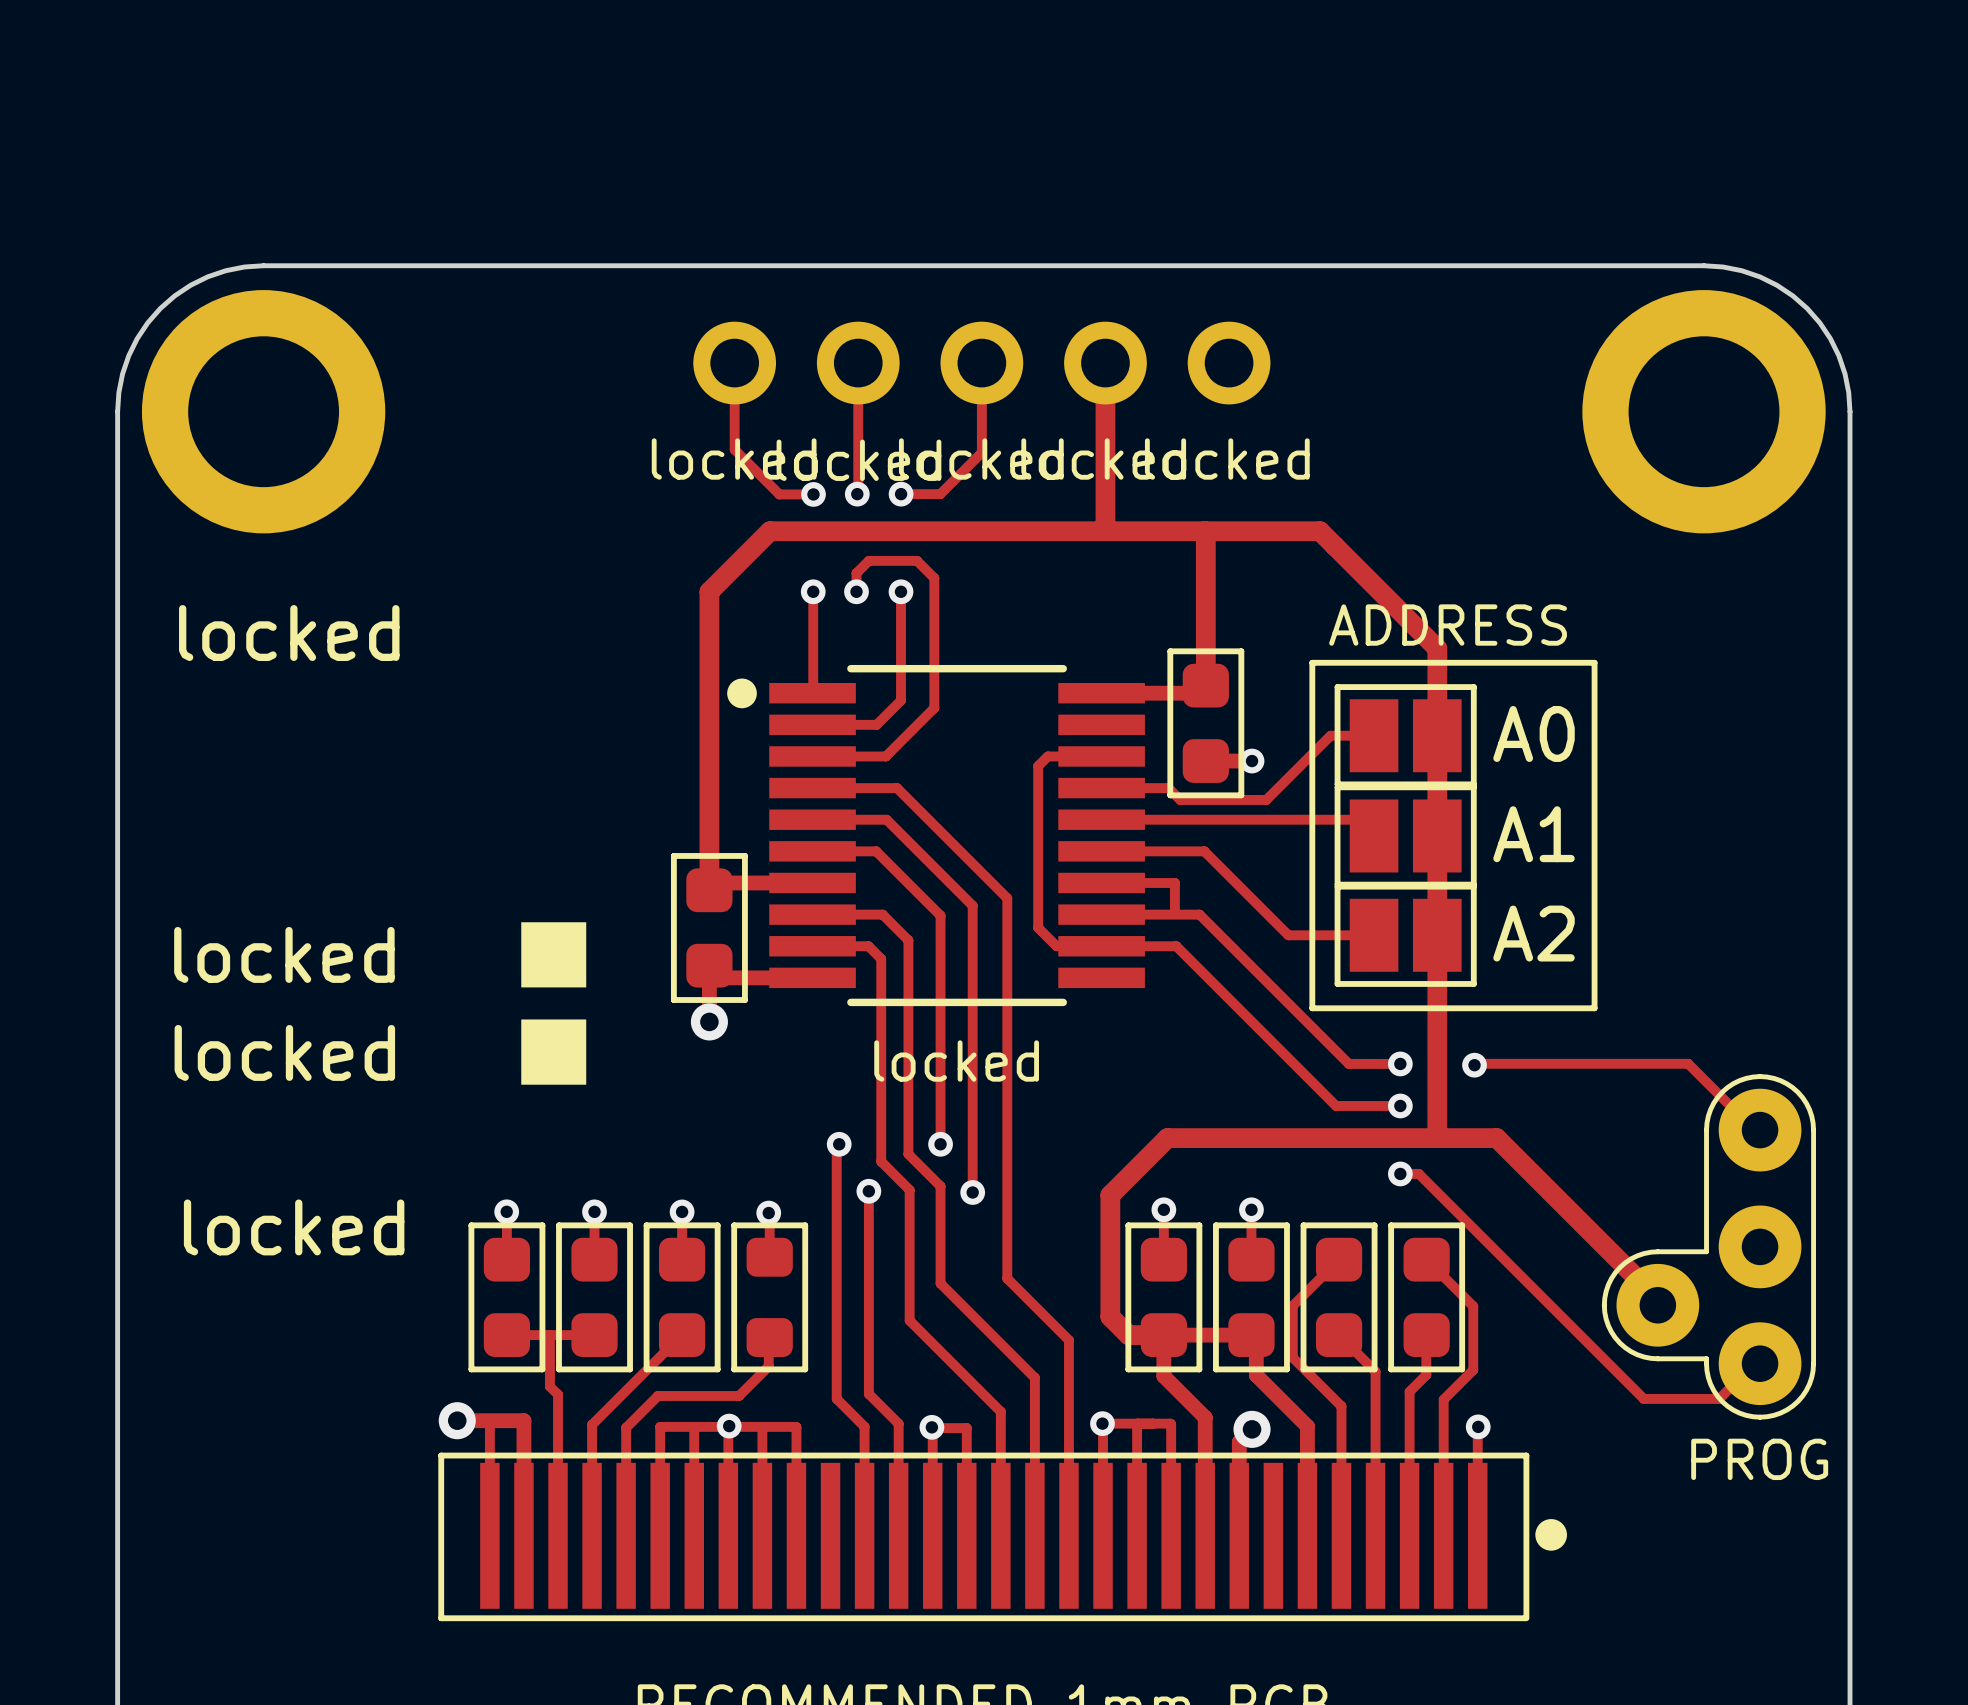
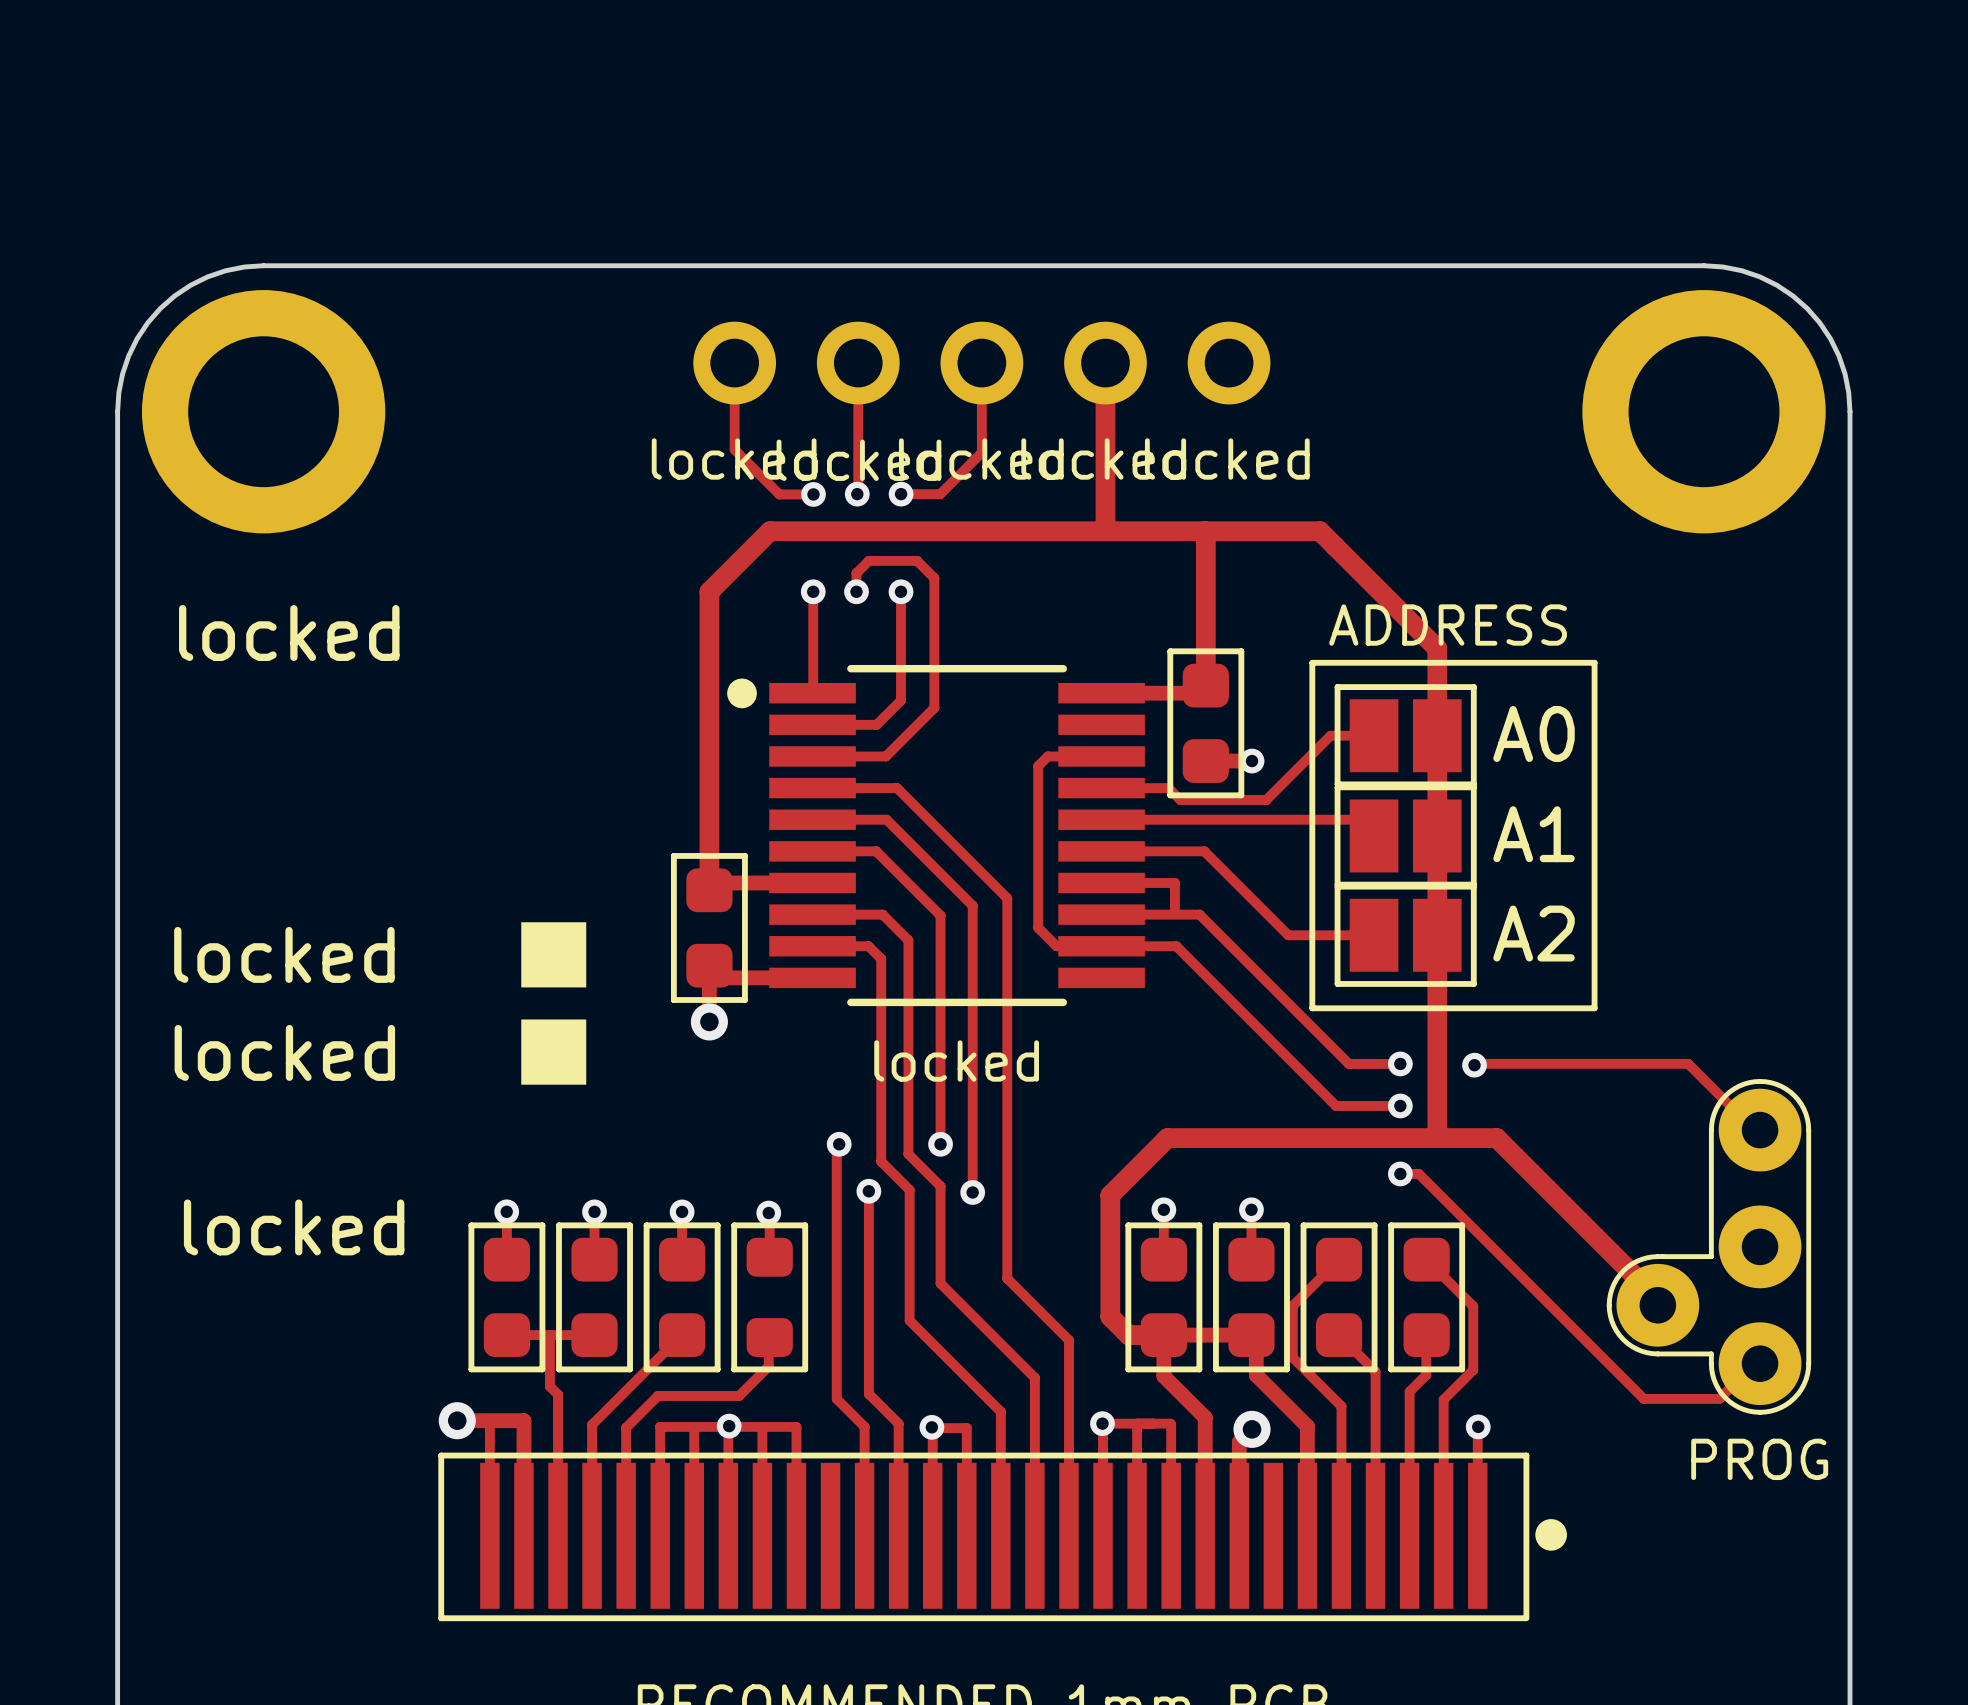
part footprint: [1601, 1074, 1817, 1420] -> [1606, 1078, 1812, 1415]

